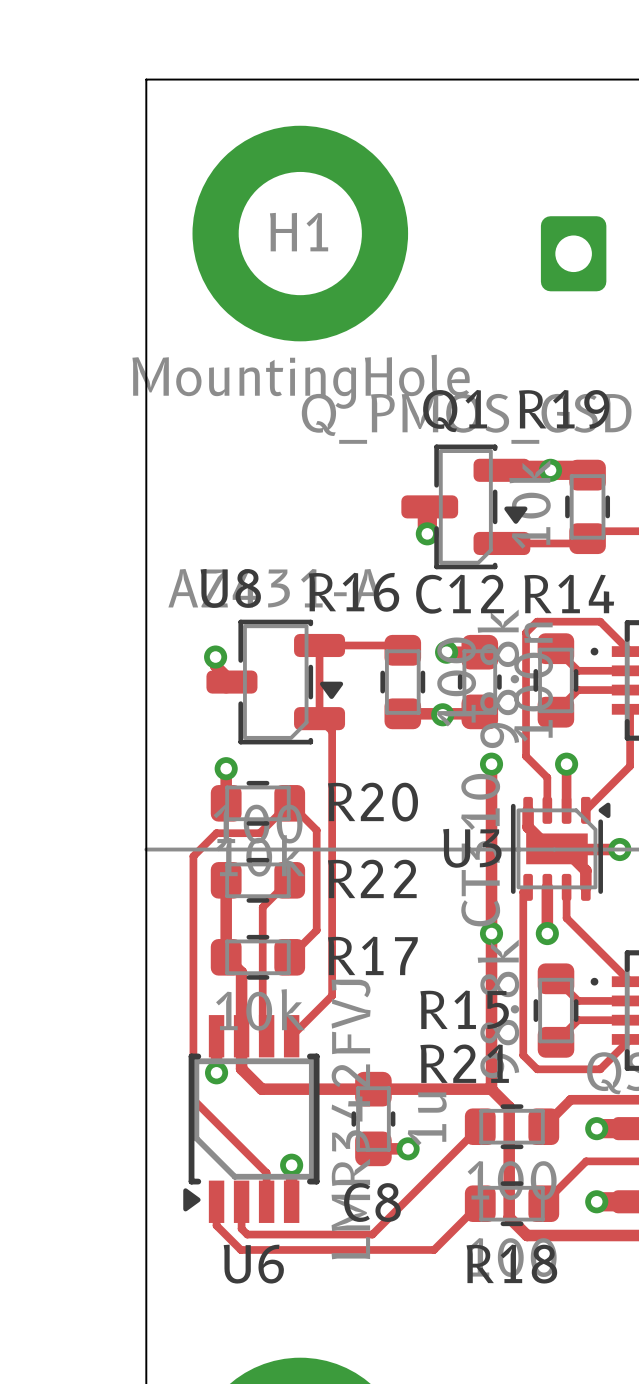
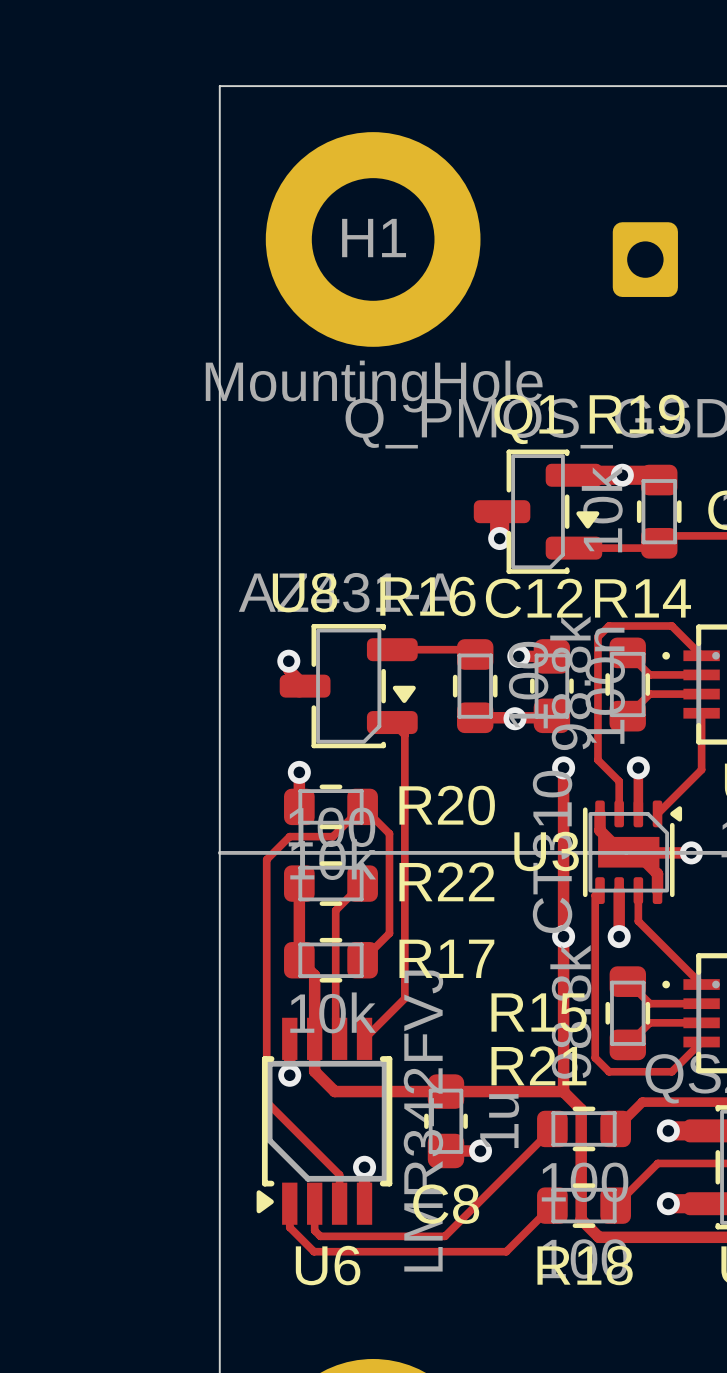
track: (319, 645) (319, 718) -> none

